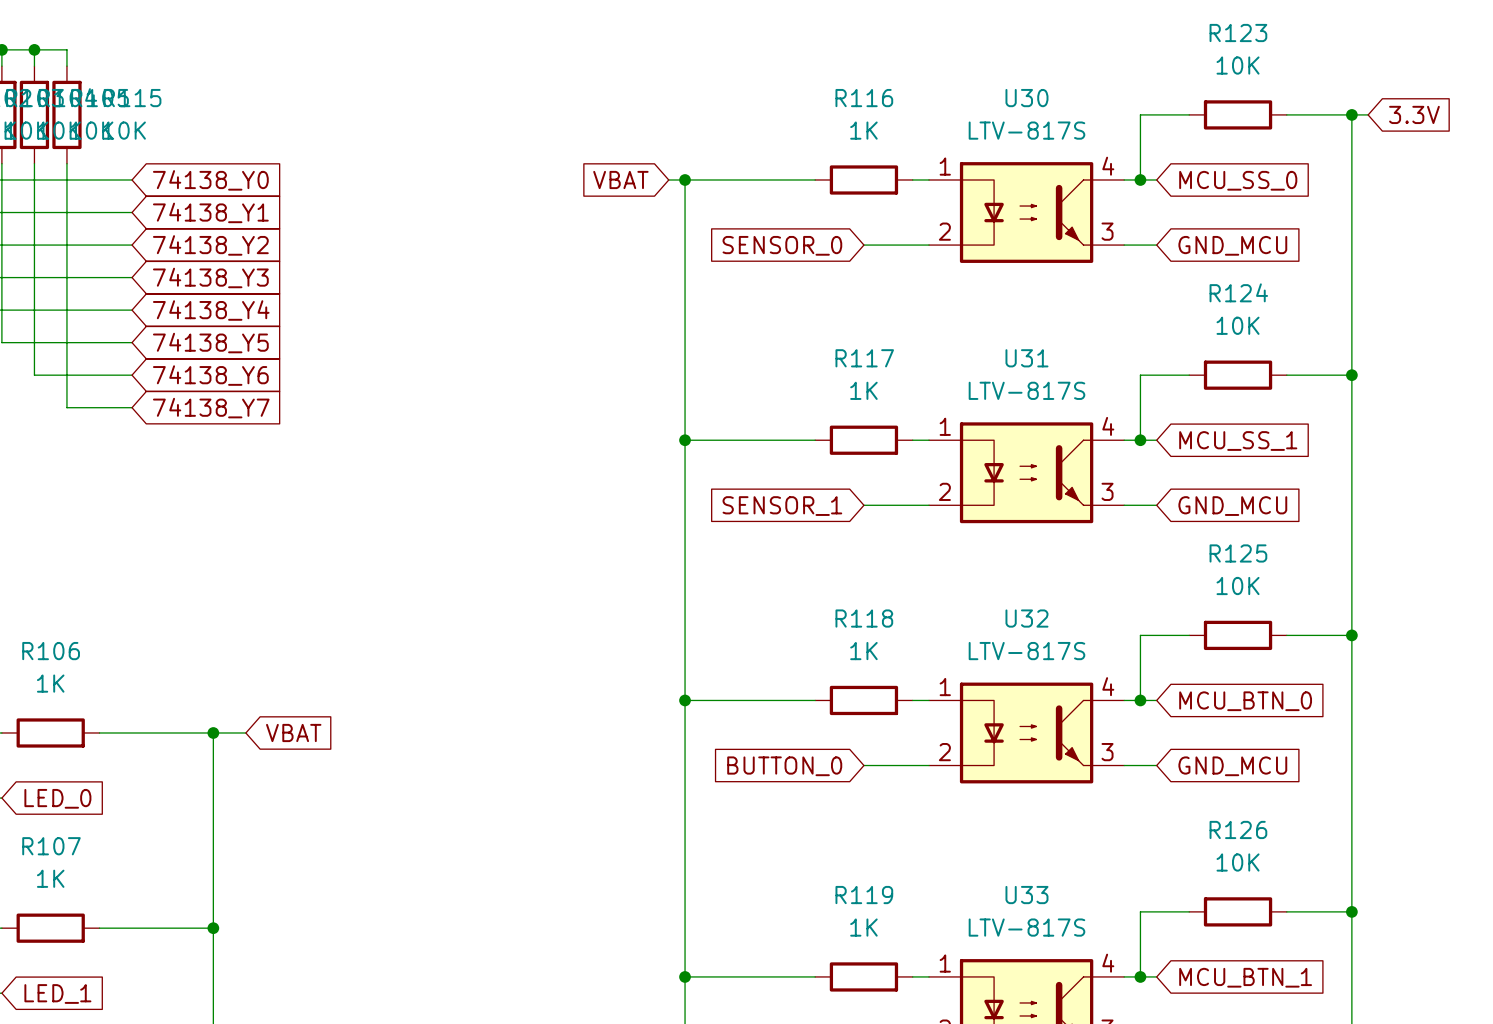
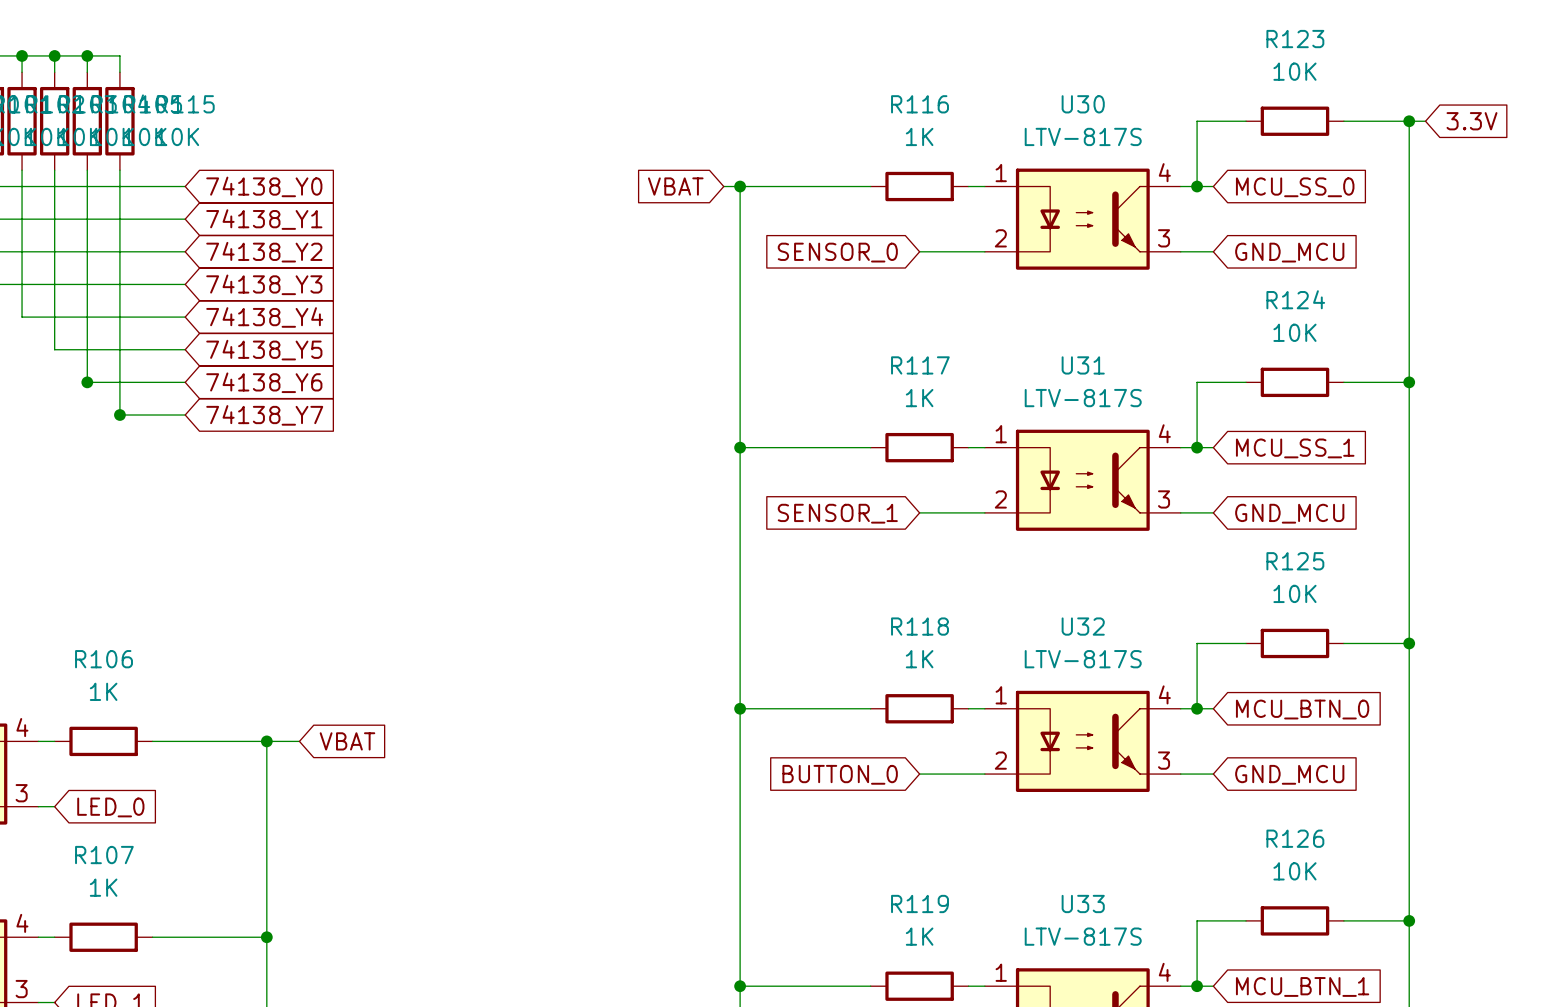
junction: none -> (87, 382)
junction: none -> (119, 415)

